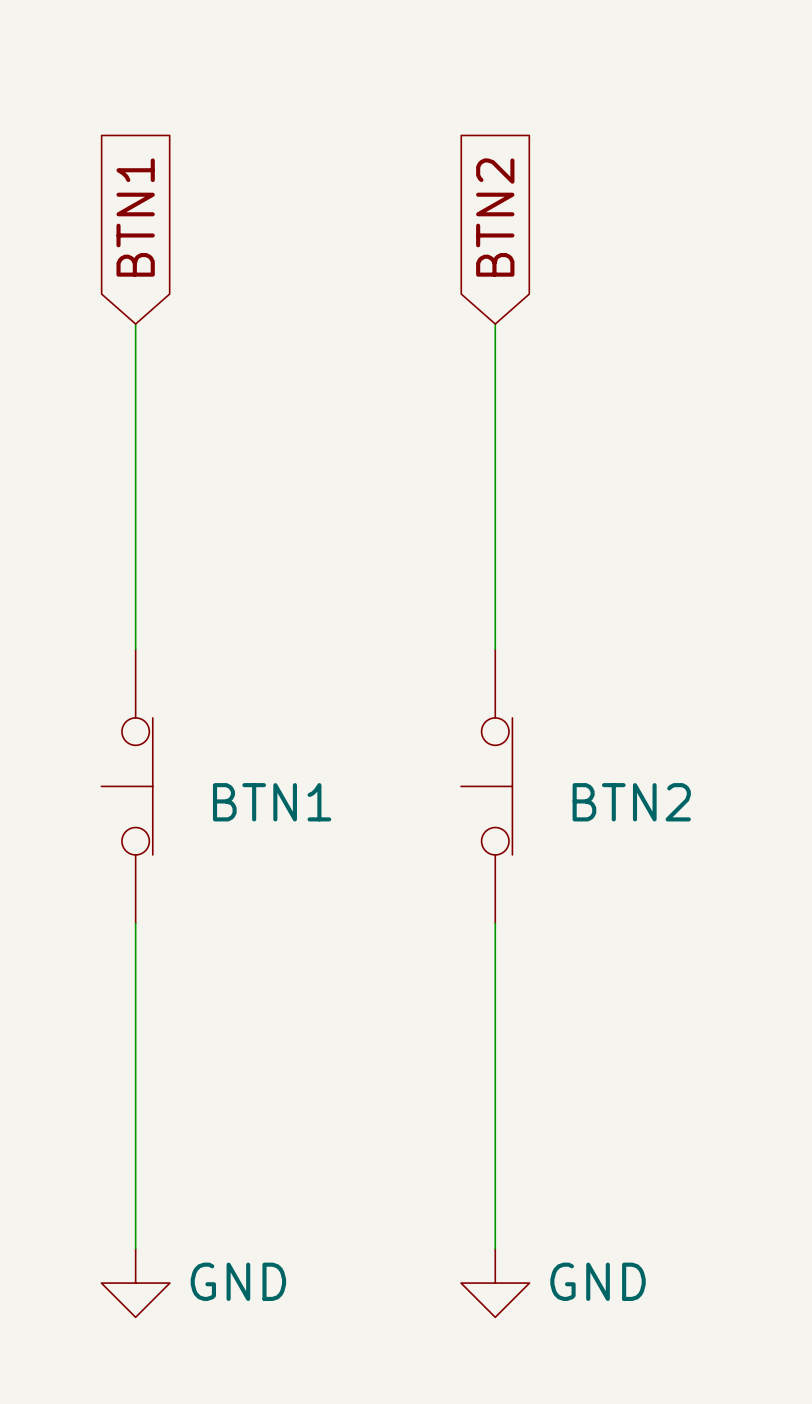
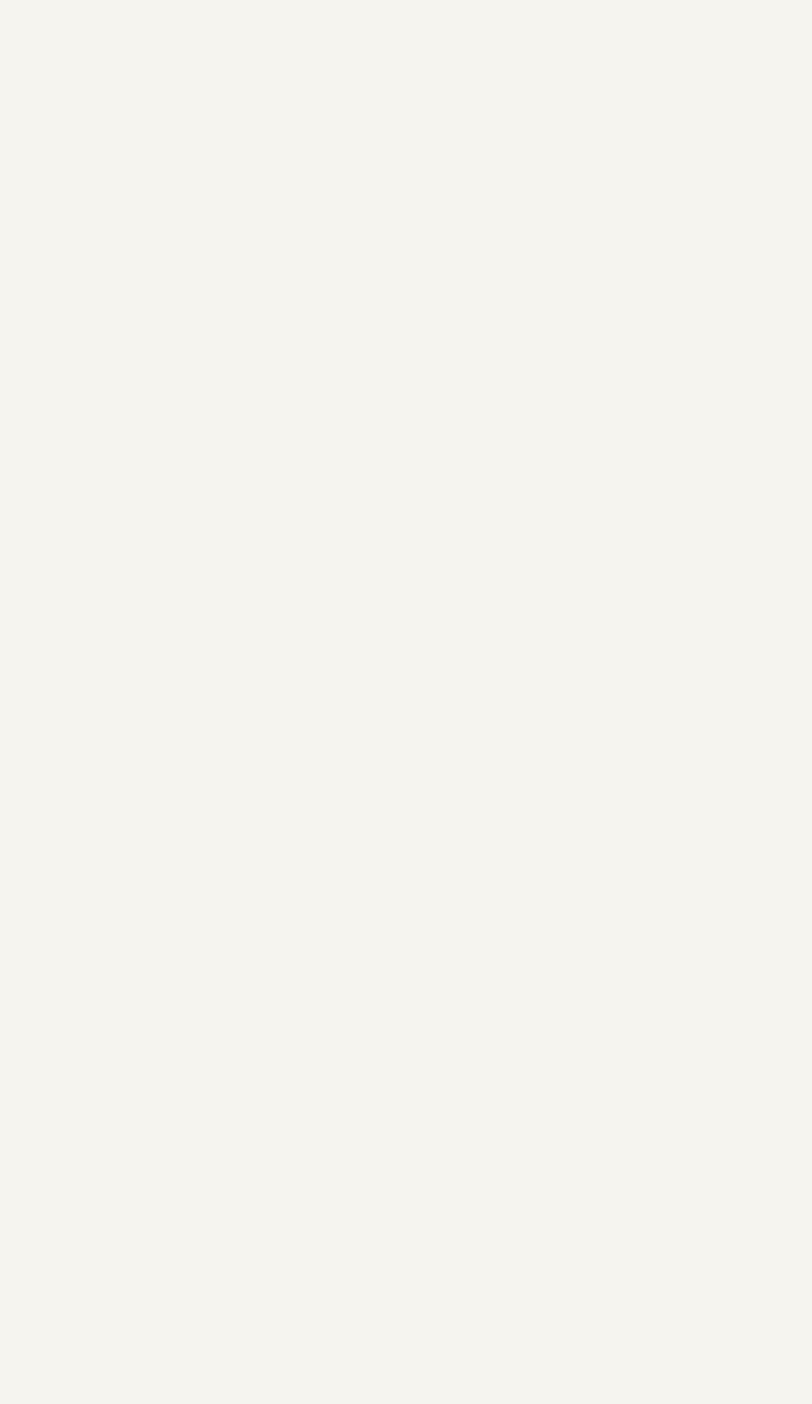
global label: BTN1 (135, 217) -> none
global label: BTN2 (495, 217) -> none
wire: (135, 324) (135, 649) -> none
wire: (495, 324) (495, 649) -> none
BTN1: (127, 786) -> none
BTN2: (486, 786) -> none
wire: (135, 923) (135, 1248) -> none
wire: (495, 923) (495, 1248) -> none
power symbol: GND (135, 1283) -> none
power symbol: GND (495, 1283) -> none

